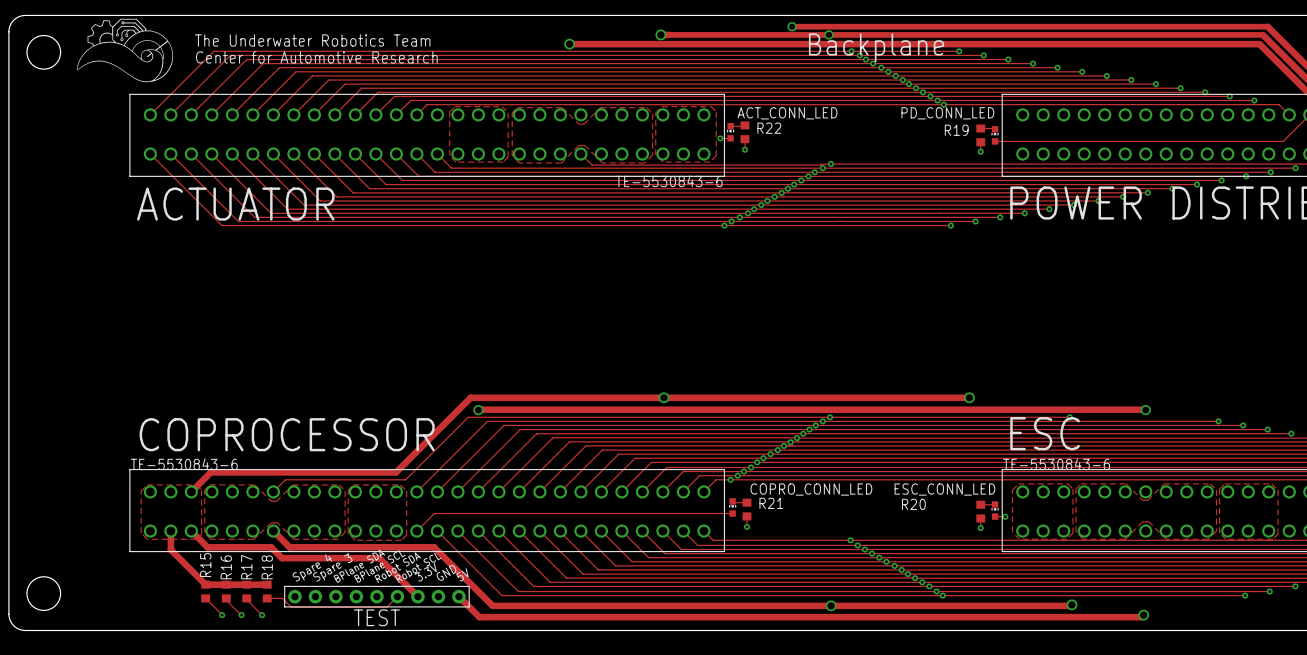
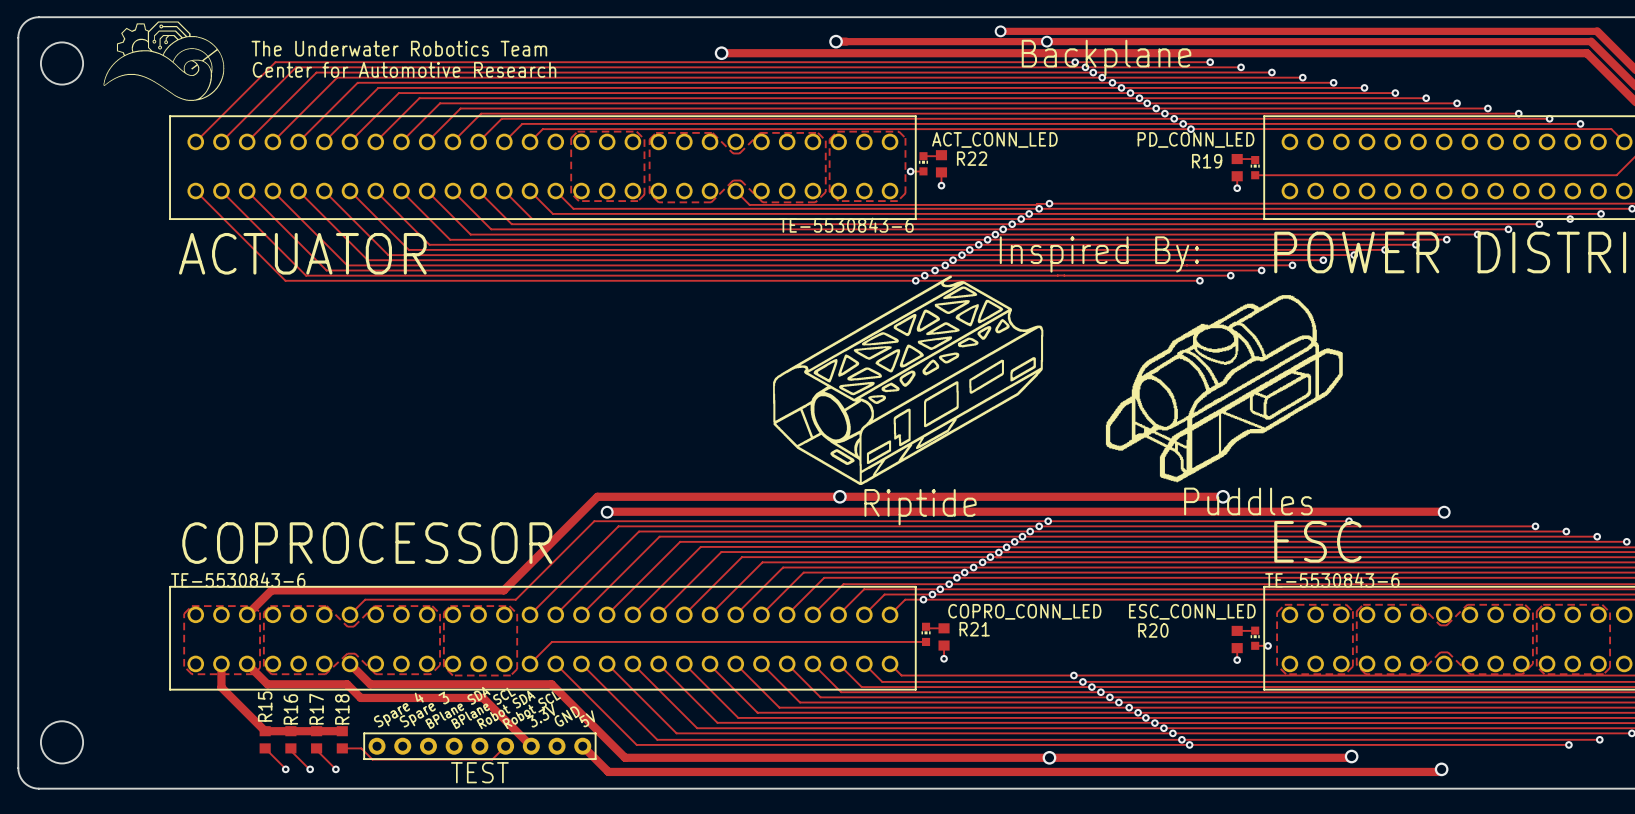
text: none -> Inspired By: (1099, 254)
drawing: none -> [773, 275, 1044, 485]
drawing: none -> [1105, 295, 1343, 483]
text: none -> Puddles (1248, 501)
text: none -> Riptide (920, 507)

